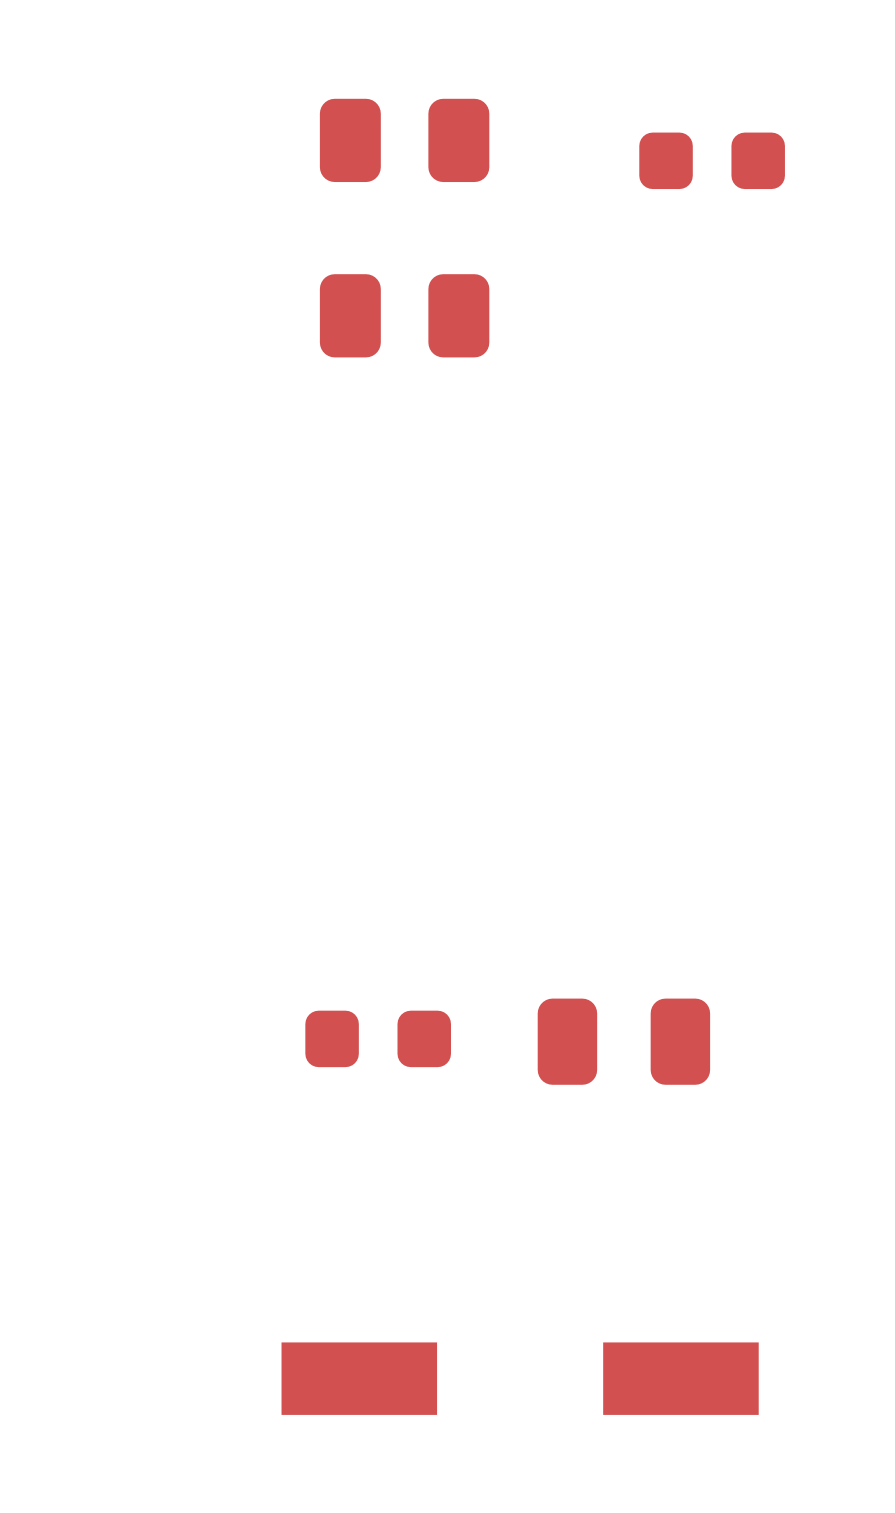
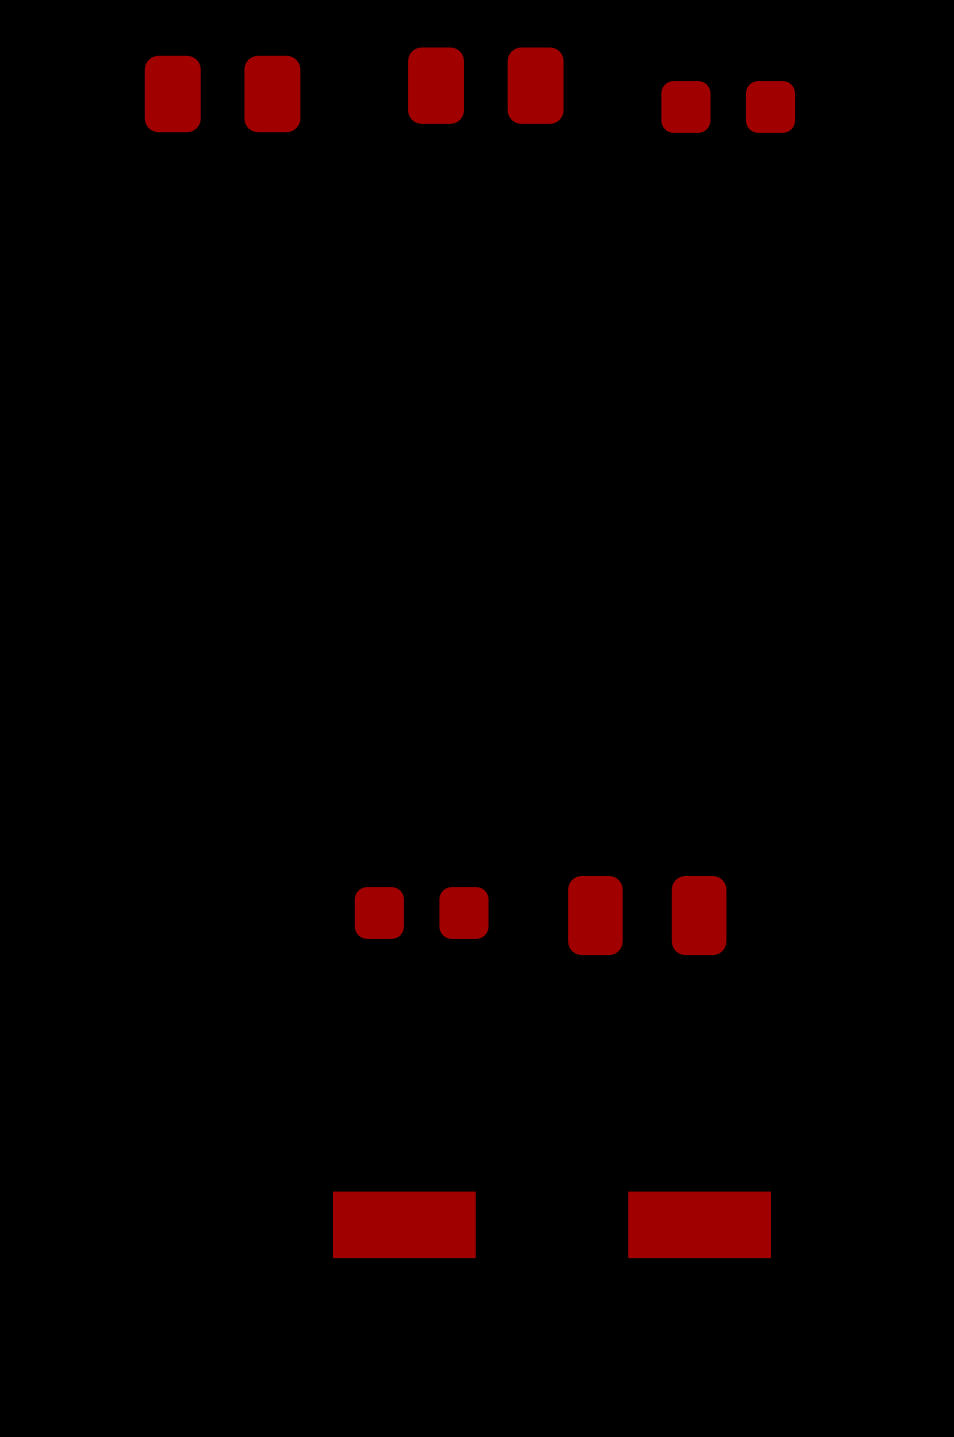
part position: (404, 140) -> (485, 85)
part position: (404, 315) -> (222, 94)

